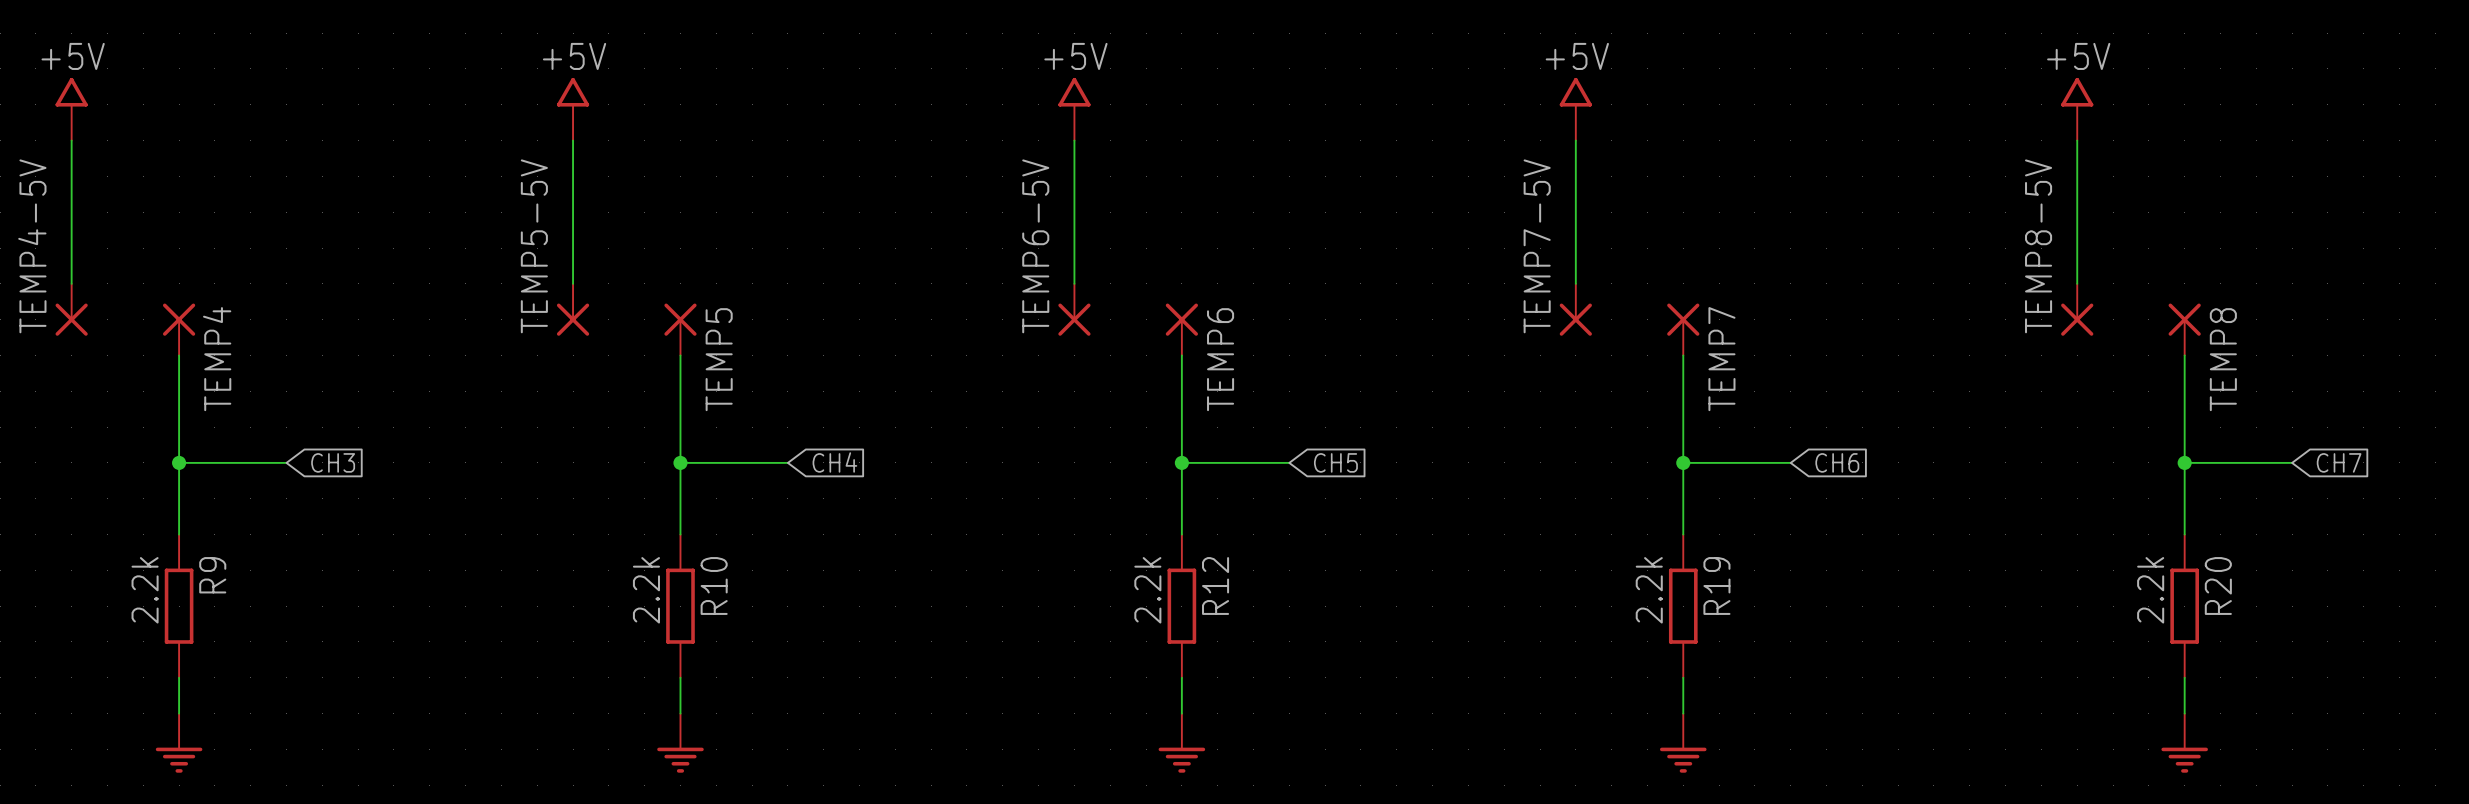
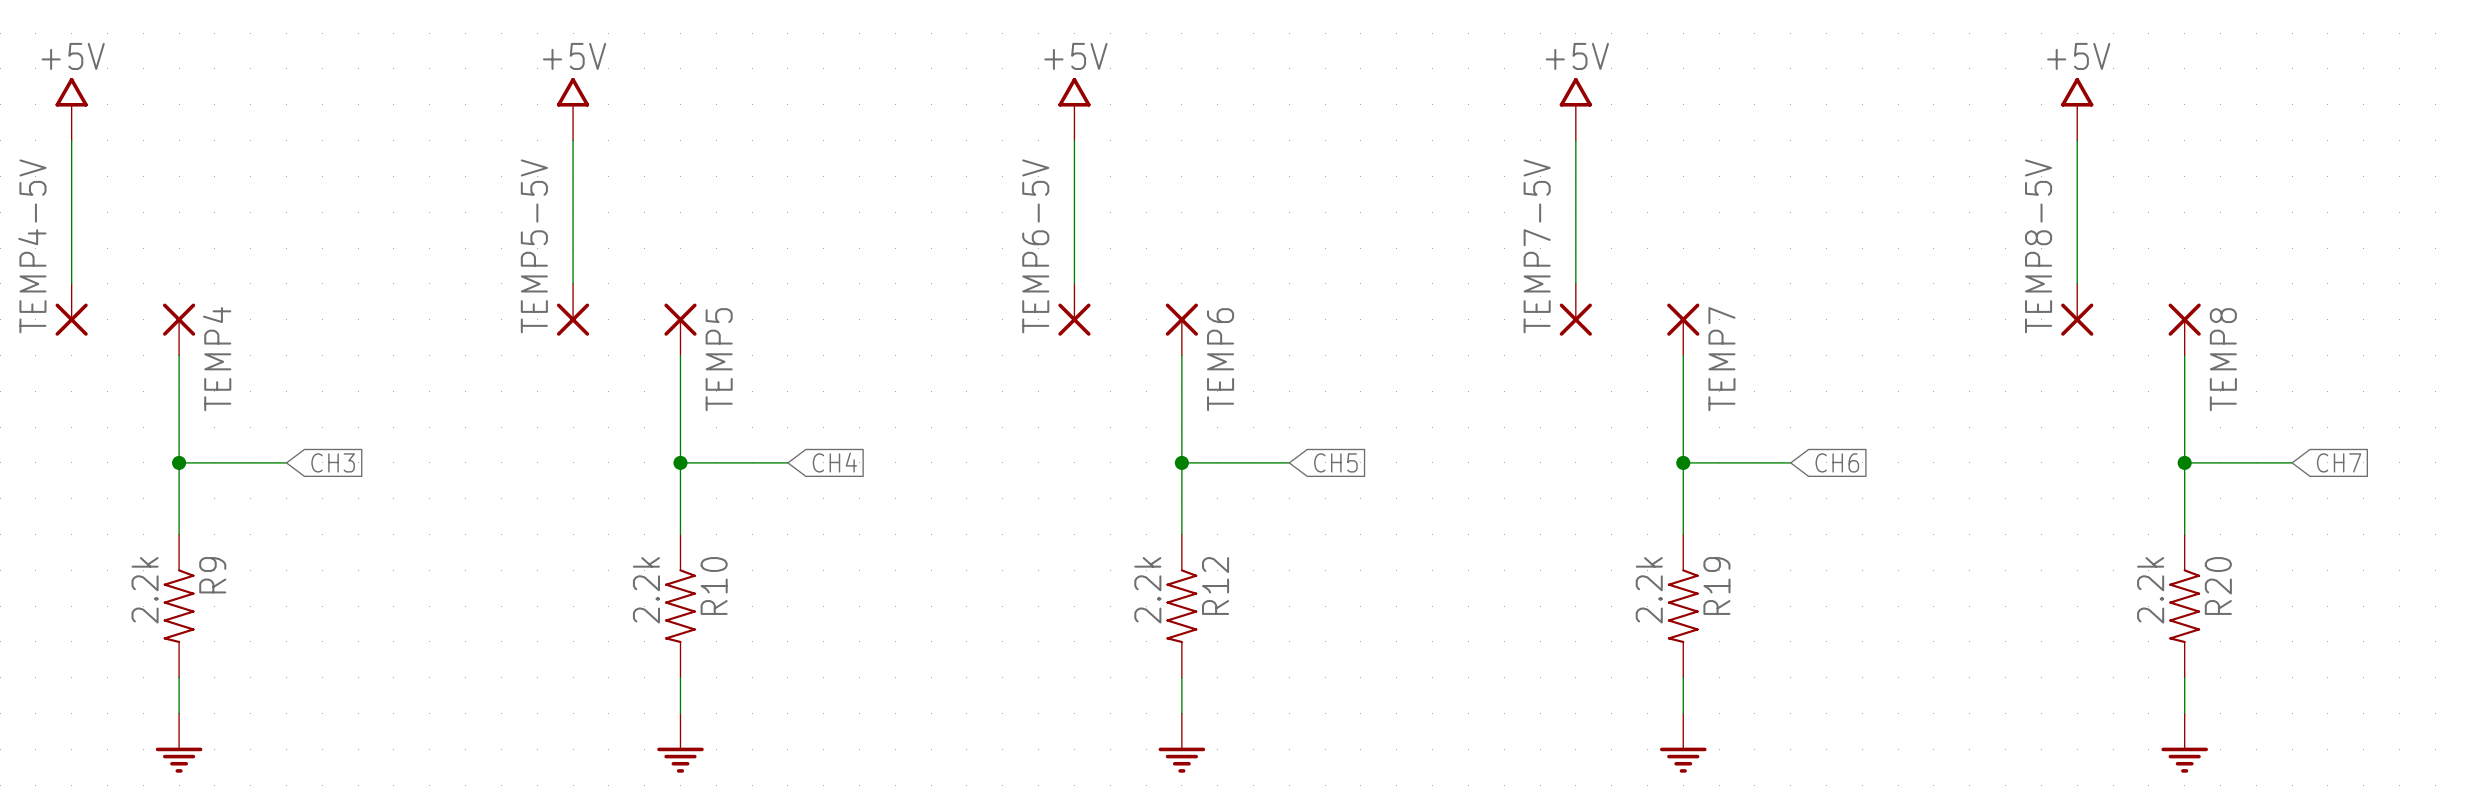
R9 symbol: [164, 534, 194, 678] -> [163, 534, 195, 678]
R10 symbol: [666, 534, 695, 678] -> [665, 534, 696, 678]
R12 symbol: [1167, 534, 1197, 678] -> [1166, 534, 1198, 678]
R19 symbol: [1668, 534, 1698, 678] -> [1667, 534, 1699, 678]
R20 symbol: [2170, 534, 2200, 678] -> [2169, 534, 2201, 678]

